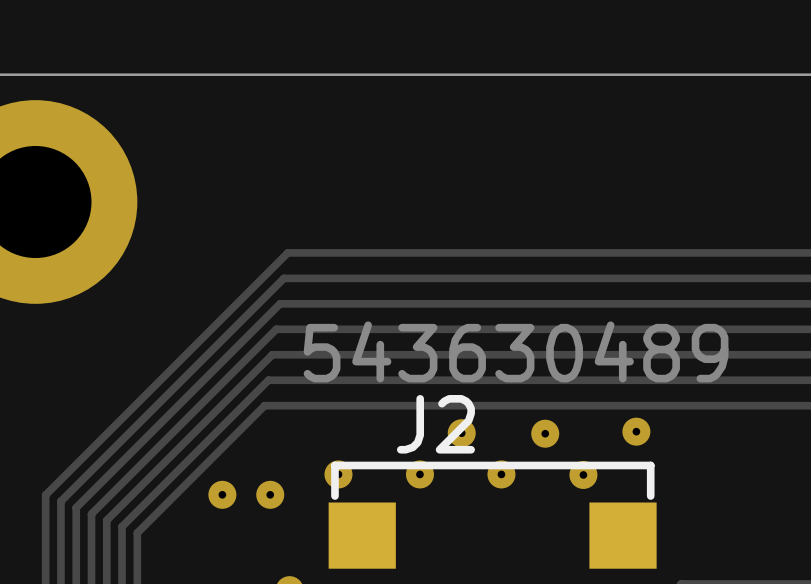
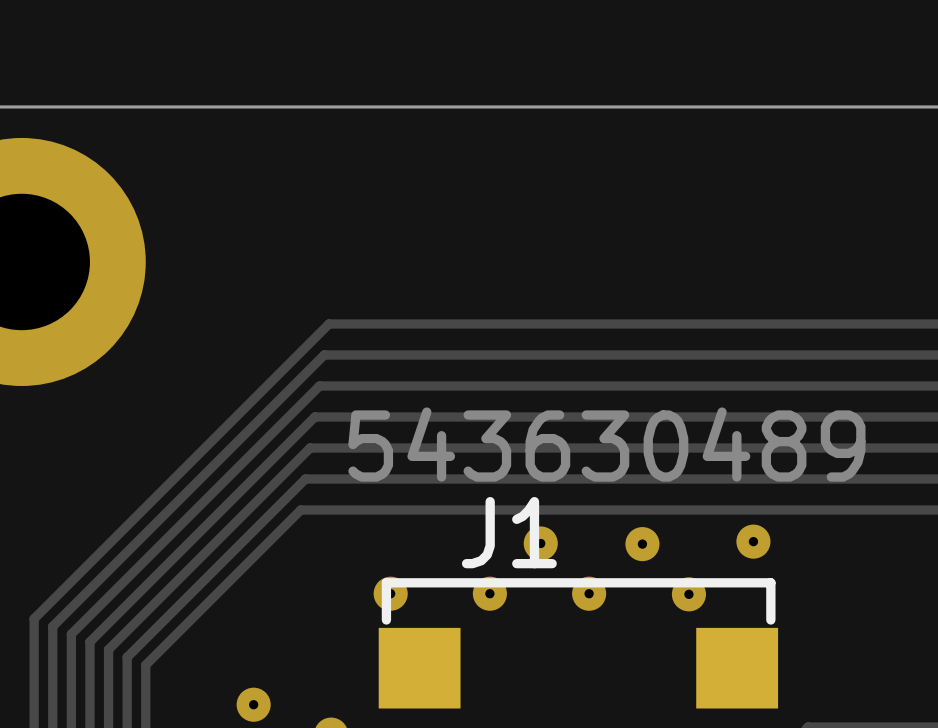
J2 name: J2 (435, 424) -> J1 (509, 532)
via: (222, 494) -> none
via: (270, 494) -> none
via: none -> (253, 704)

